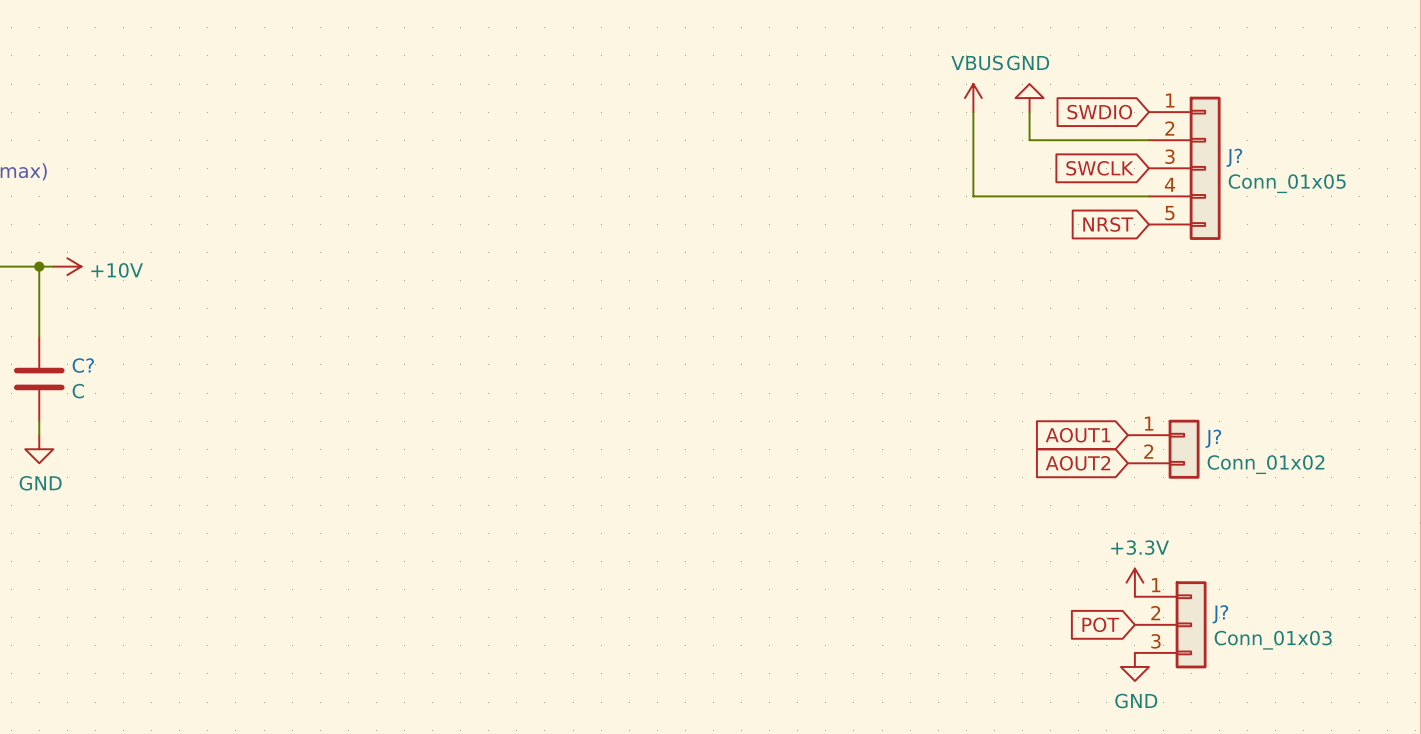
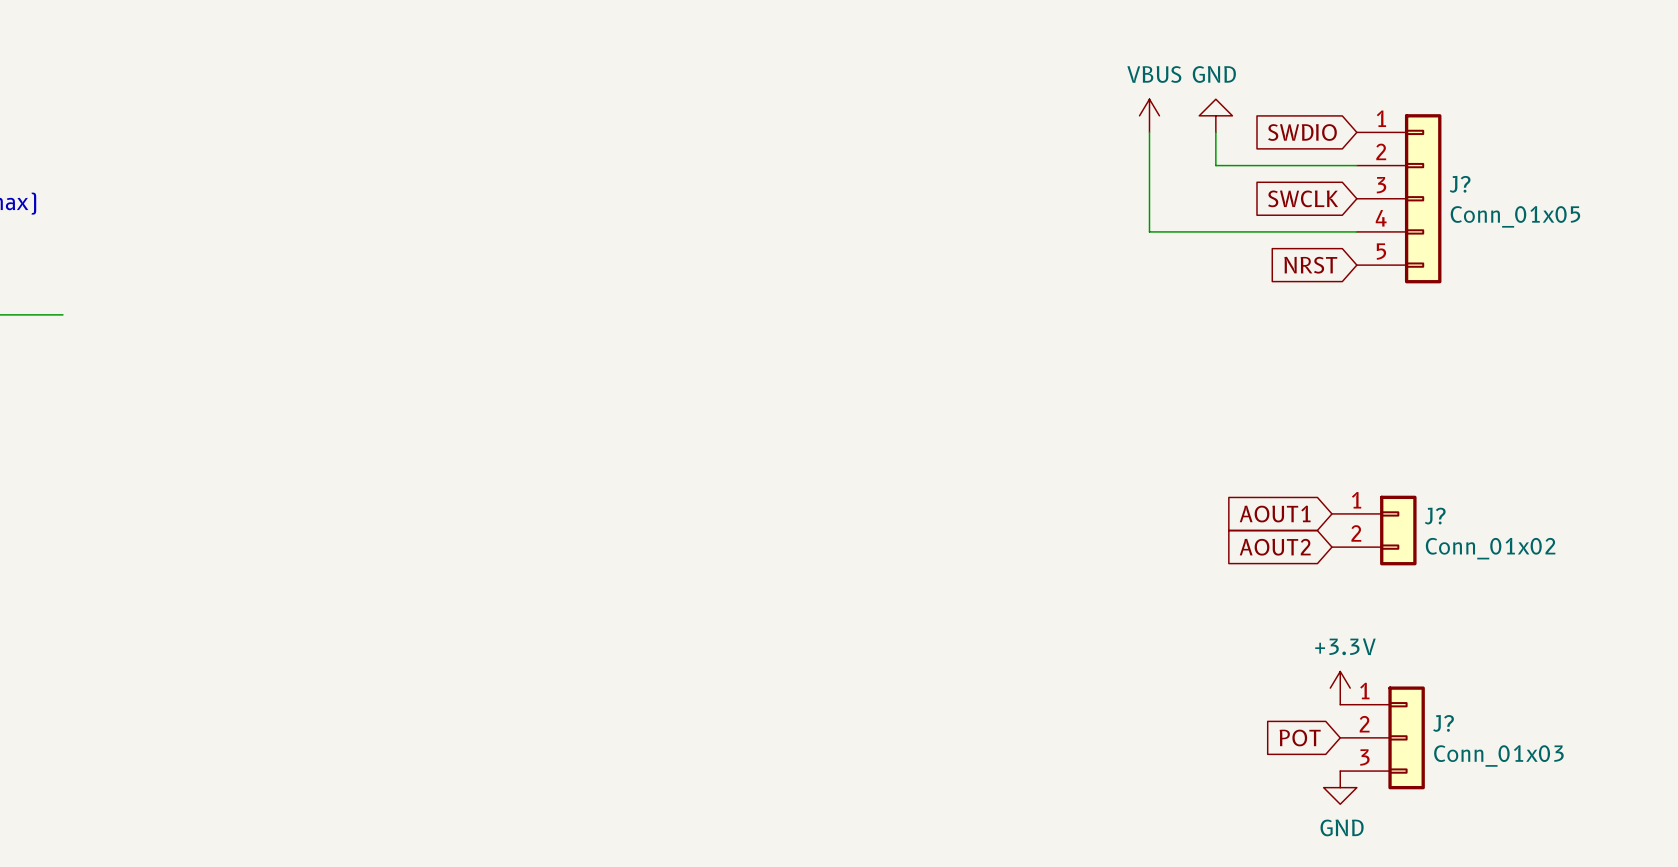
wire: (39, 266) (39, 336) -> none
junction: (39, 266) -> none
power symbol: +10V (67, 266) -> none
C?: C (39, 379) -> none
wire: (39, 421) (39, 435) -> none
power symbol: GND (39, 449) -> none

